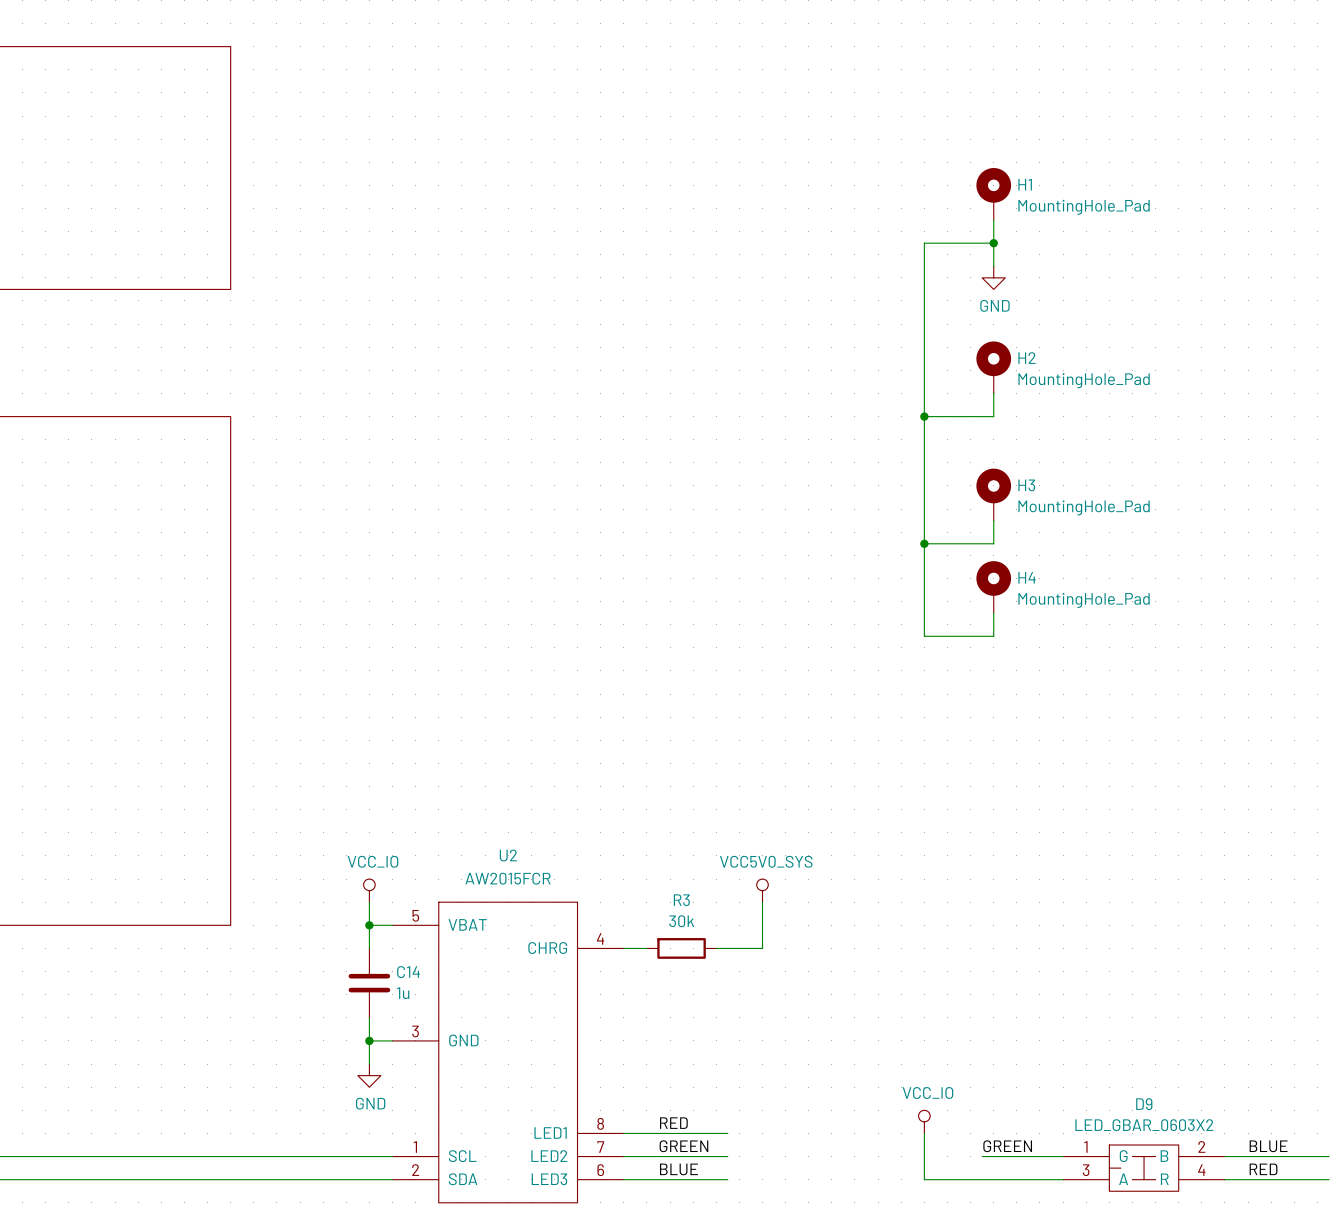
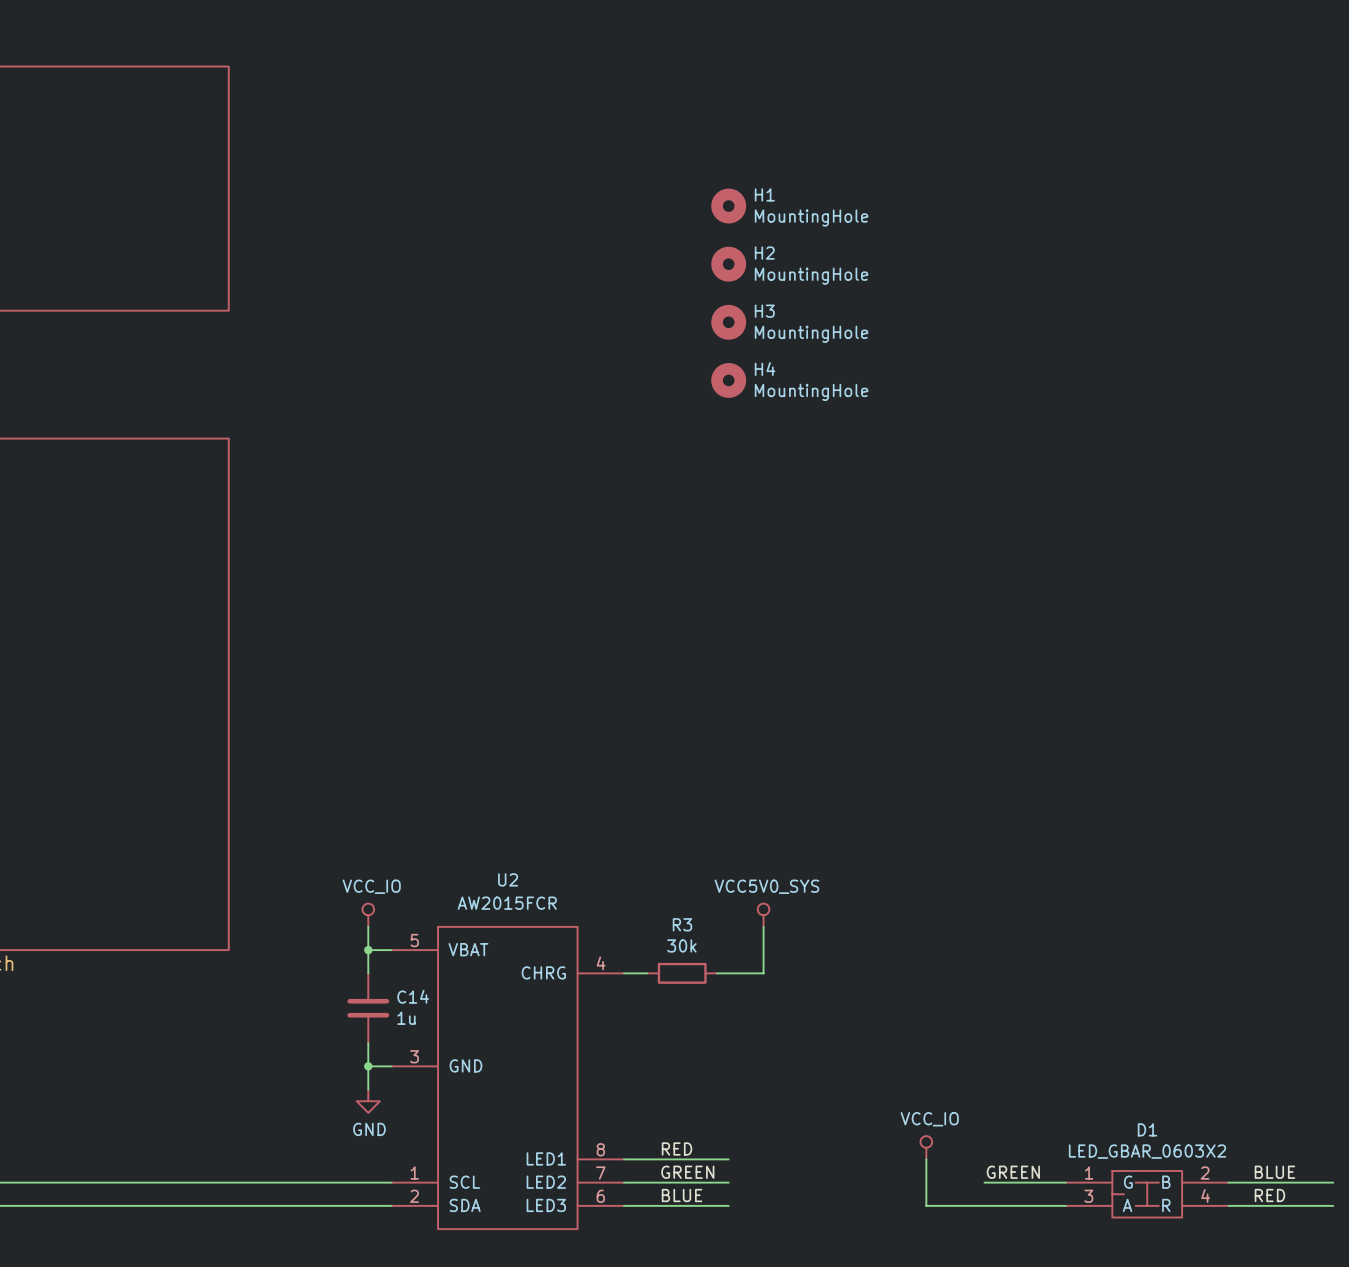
H1 symbol: [976, 168, 1012, 221] -> [711, 188, 747, 224]
H1 value: MountingHole_Pad (1084, 207) -> MountingHole (811, 218)
wire: (993, 220) (993, 266) -> none
wire: (993, 243) (924, 243) (924, 636) (993, 636) (993, 613) -> none
junction: (993, 243) -> none
power symbol: GND (993, 277) -> none
H2 symbol: [976, 341, 1012, 394] -> [711, 246, 747, 282]
H2 value: MountingHole_Pad (1084, 380) -> MountingHole (811, 276)
wire: (993, 393) (993, 416) (924, 416) -> none
junction: (924, 416) -> none
H3 symbol: [976, 468, 1012, 521] -> [711, 304, 747, 340]
H3 value: MountingHole_Pad (1084, 507) -> MountingHole (811, 334)
wire: (993, 520) (993, 543) (924, 543) -> none
junction: (924, 543) -> none
H4 symbol: [976, 561, 1012, 614] -> [711, 363, 747, 398]
H4 value: MountingHole_Pad (1084, 600) -> MountingHole (811, 392)
D9 name: D9 (1144, 1104) -> D1 (1147, 1129)

